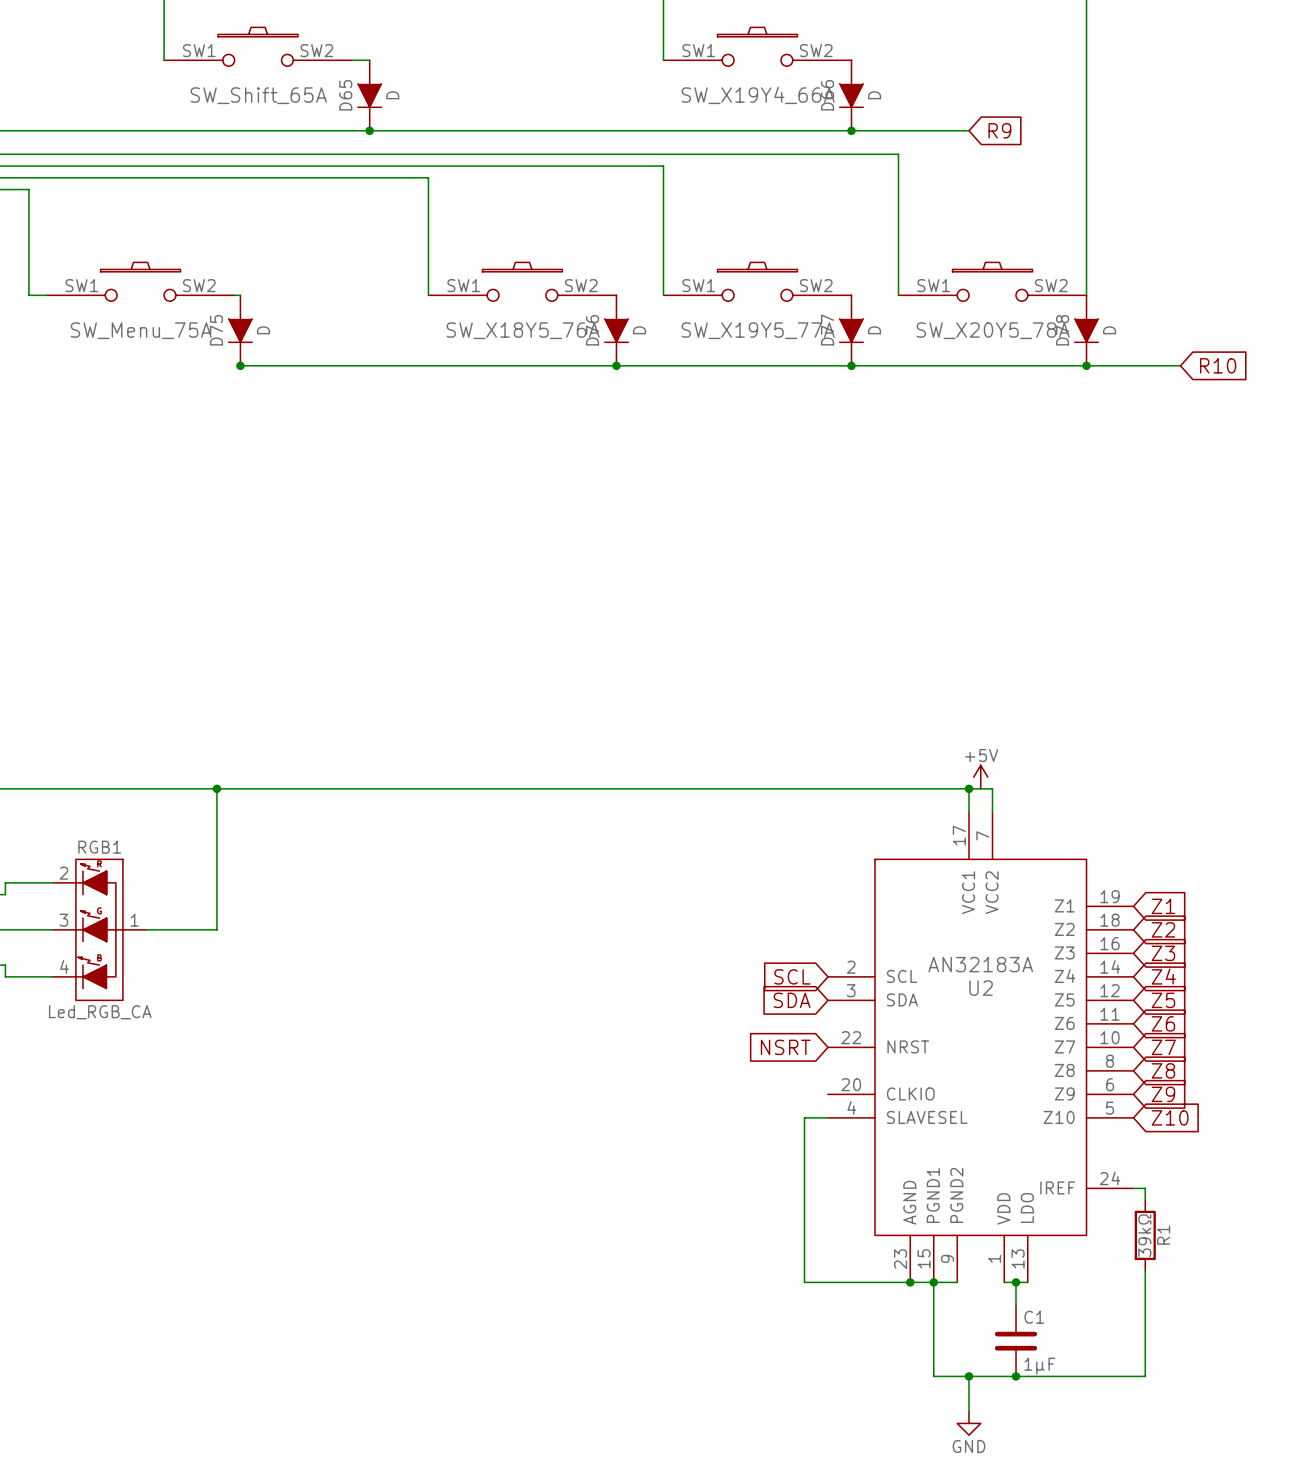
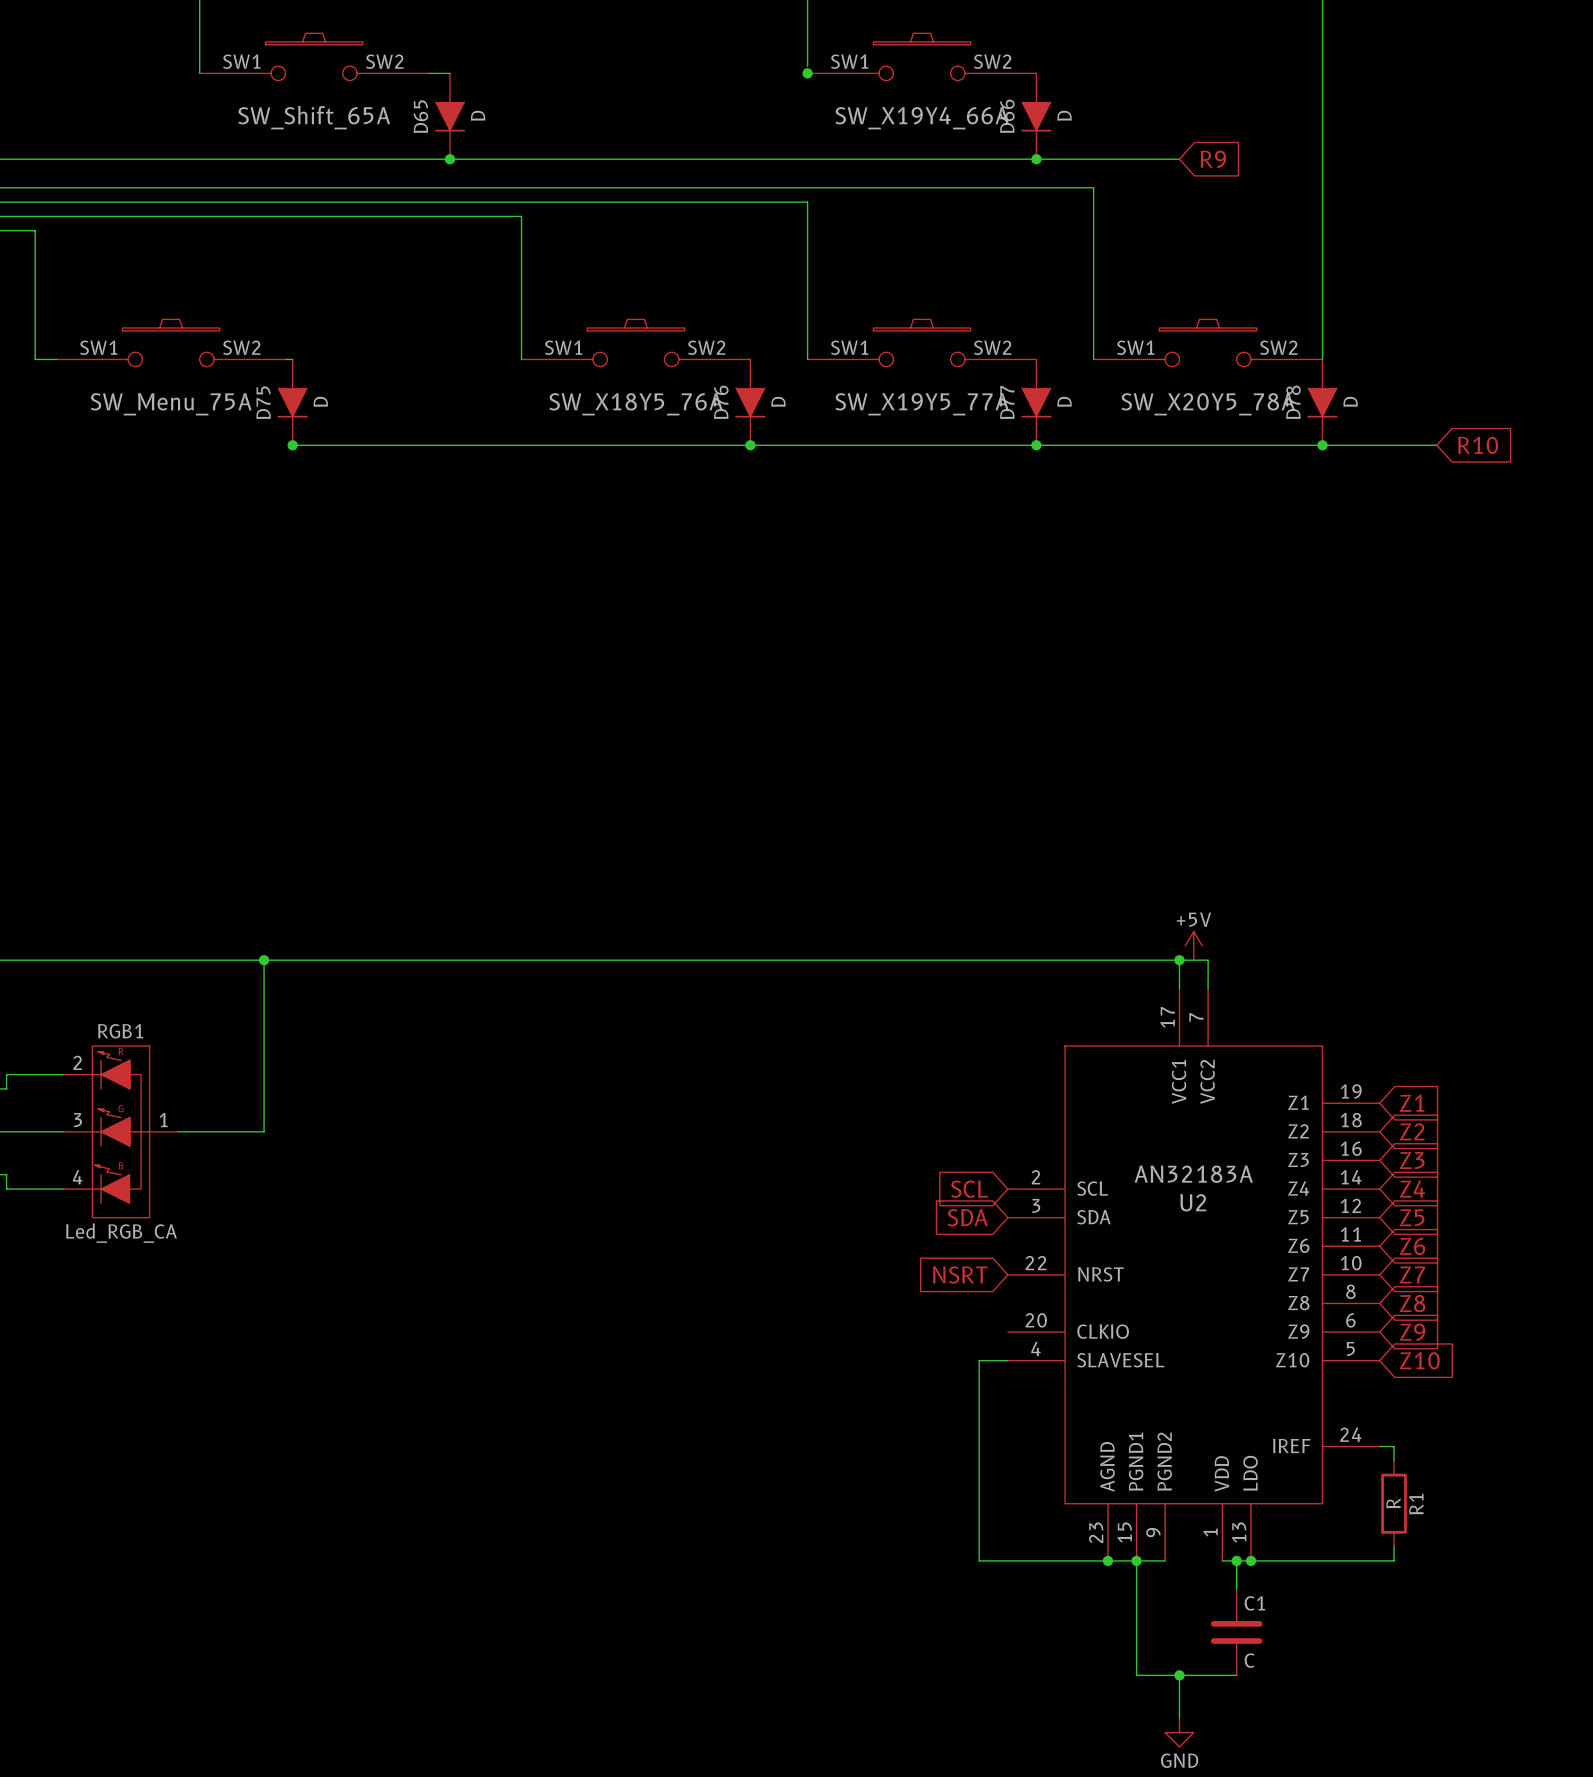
junction: none -> (807, 73)
R1 value: 39kΩ (1144, 1235) -> R (1393, 1503)
junction: none -> (1250, 1560)
wire: (1145, 1282) (1145, 1376) (1016, 1376) -> (1394, 1560) (1250, 1560)
C1 value: 1µF (1039, 1366) -> C (1249, 1660)
junction: (1016, 1376) -> none

